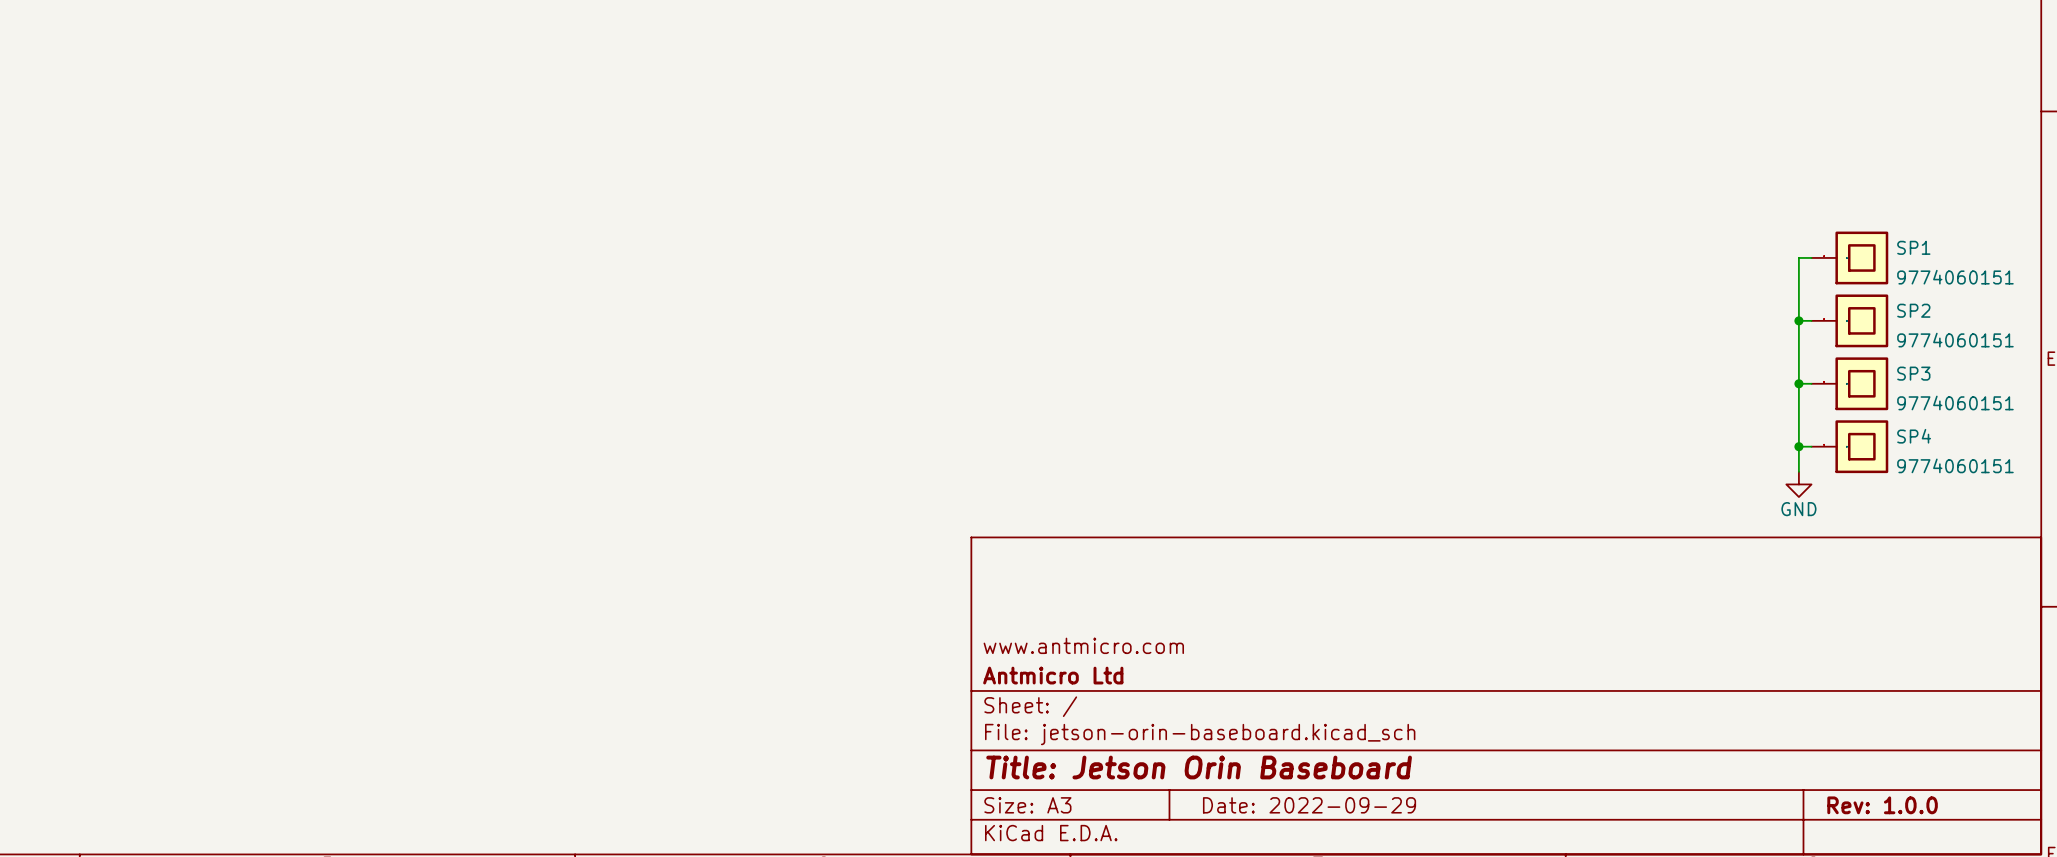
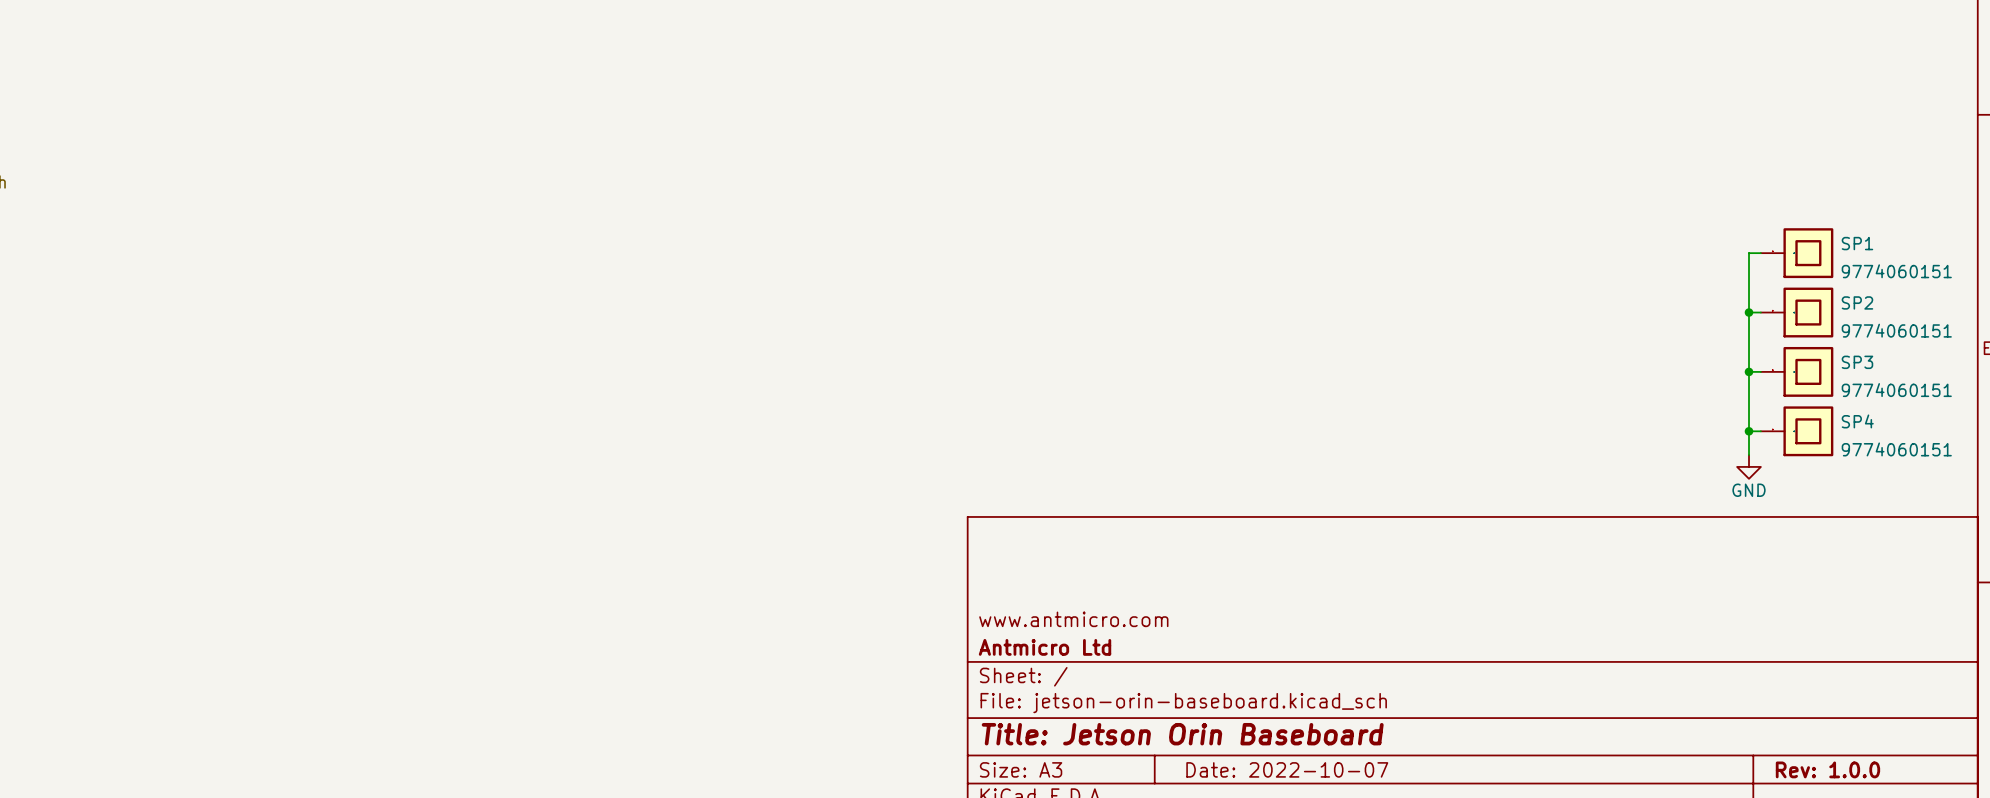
title block: Date: 2022-09-29 (1309, 805) -> Date: 2022-10-07 (1287, 769)

